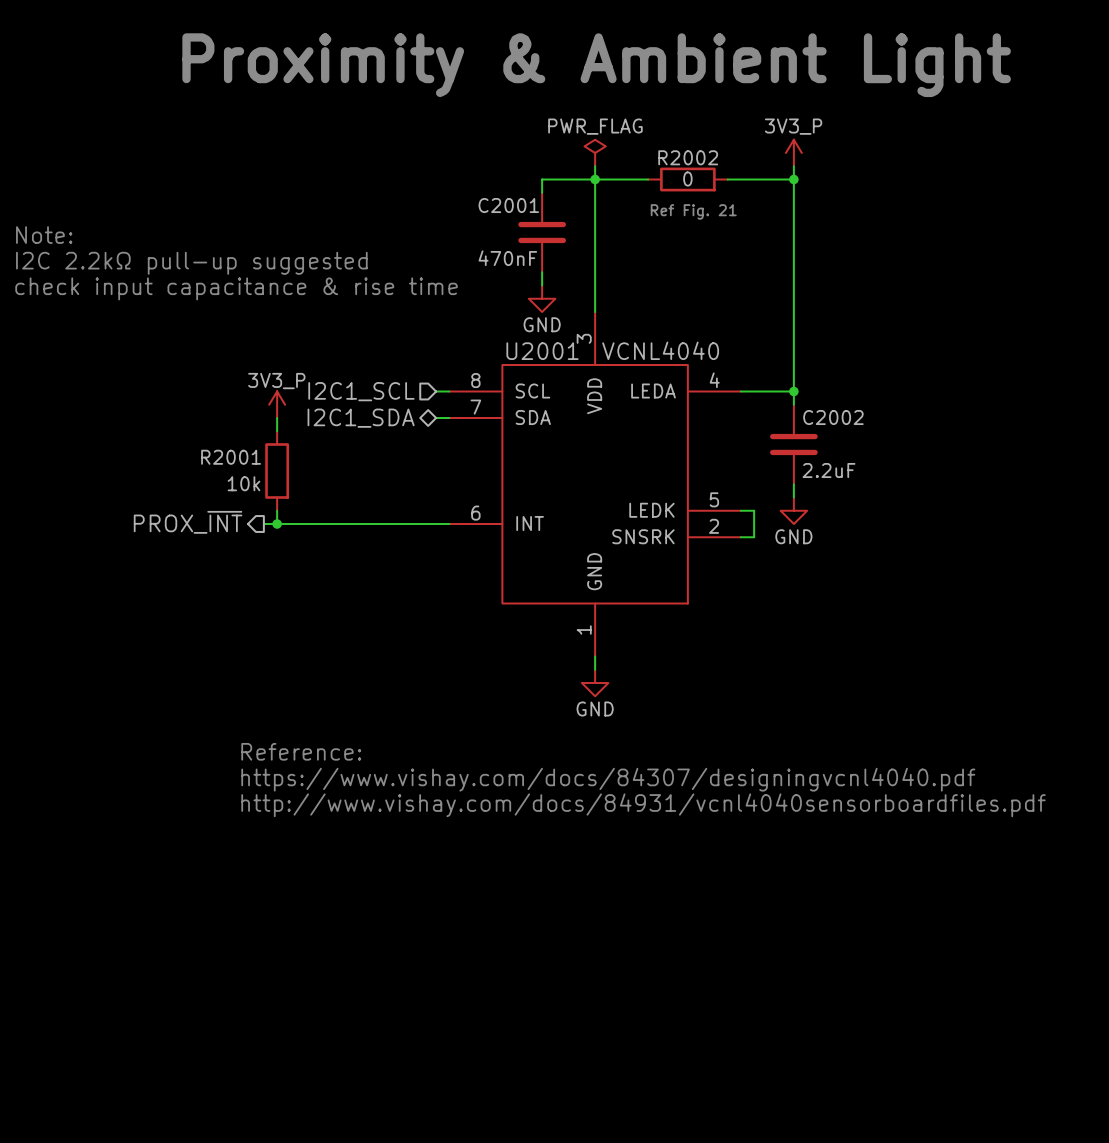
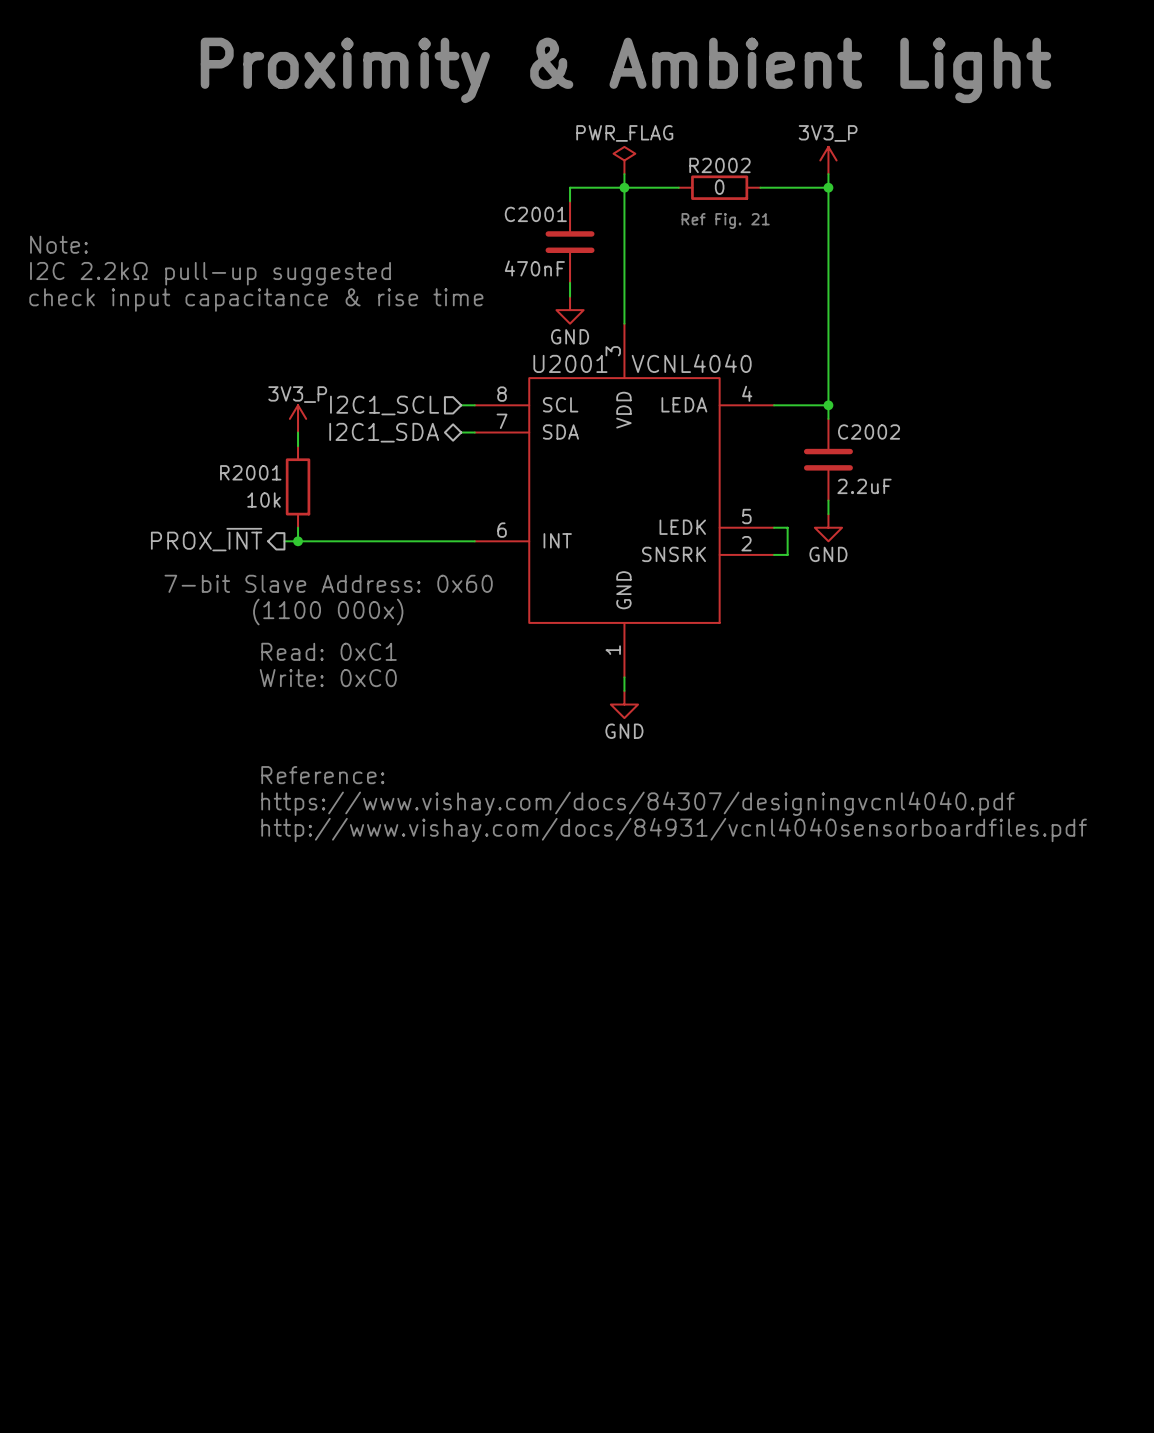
text: none -> 7-bit Slave Address: 0x60 (328, 583)
text: none -> (1100 000x) (328, 612)
text: none -> Read: 0xC1 (329, 651)
text: none -> Write: 0xC0 (328, 678)

